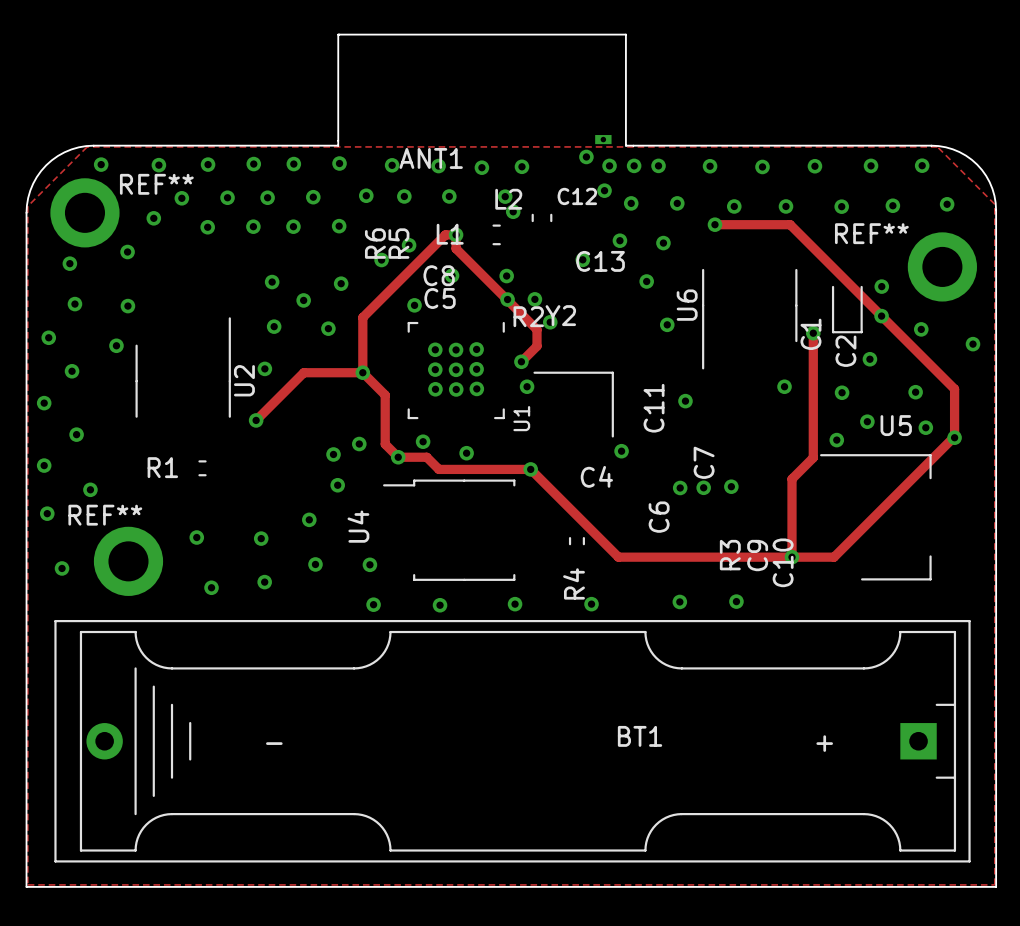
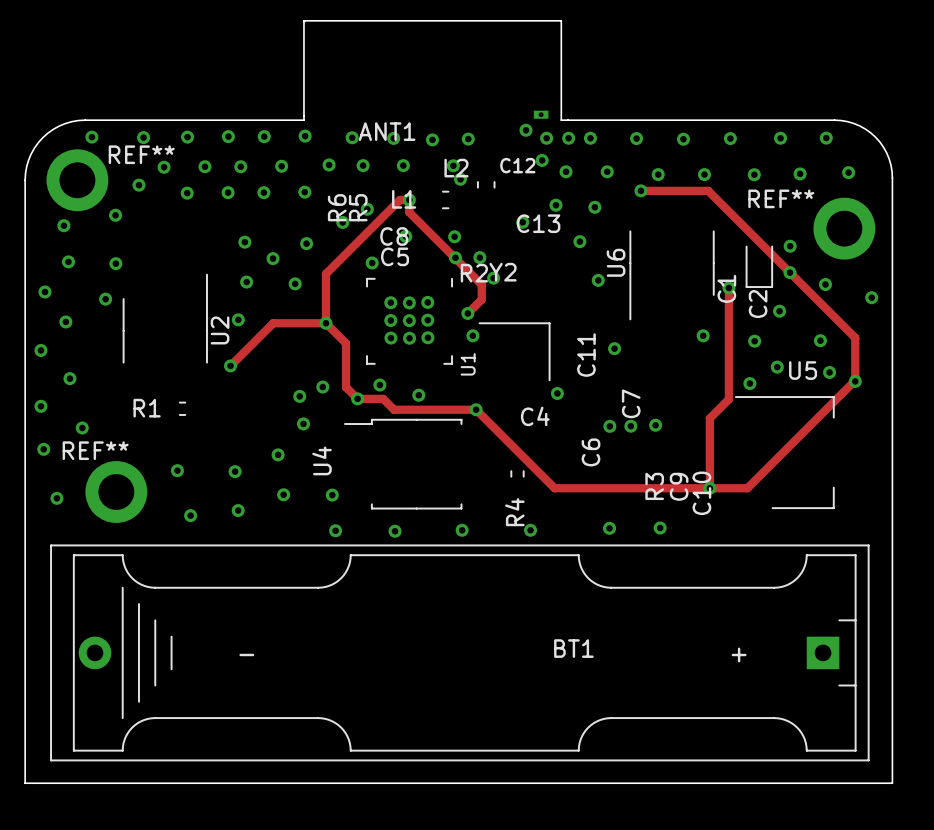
zone outline: (87, 146) (937, 146) (994, 204) (994, 884) (27, 884) (27, 206) (87, 146) -> none

